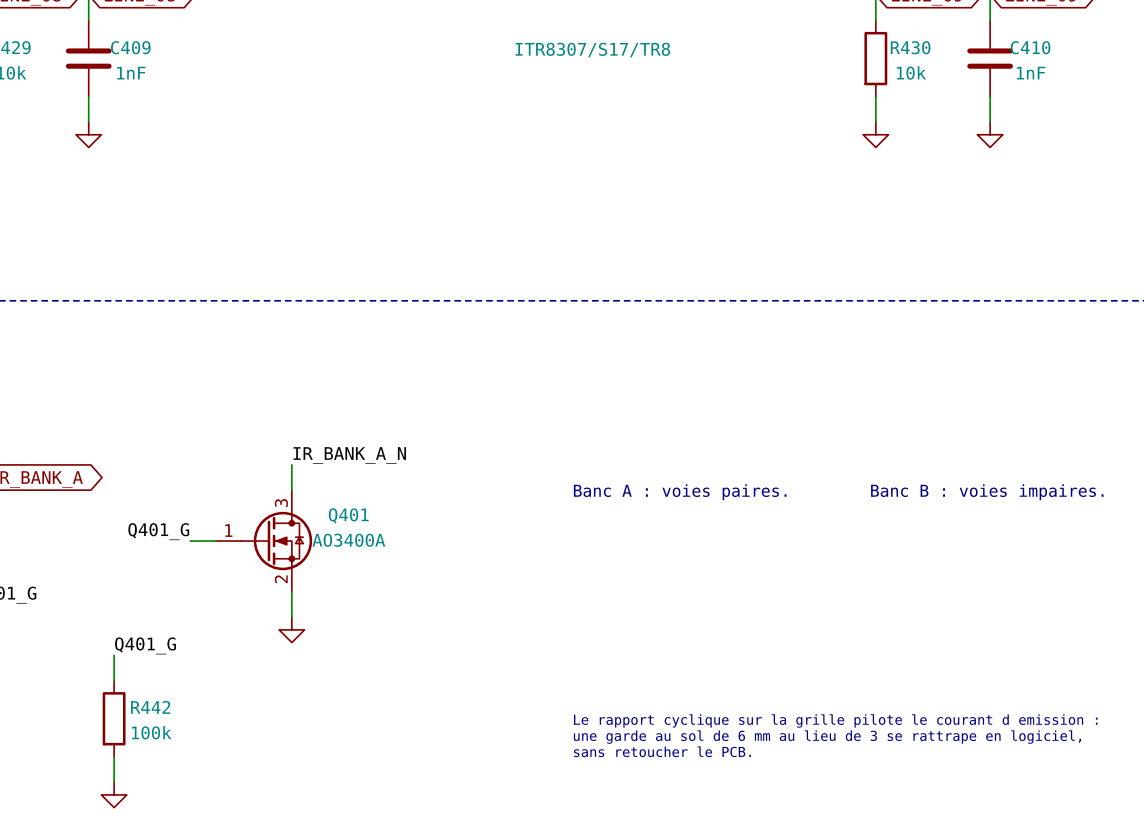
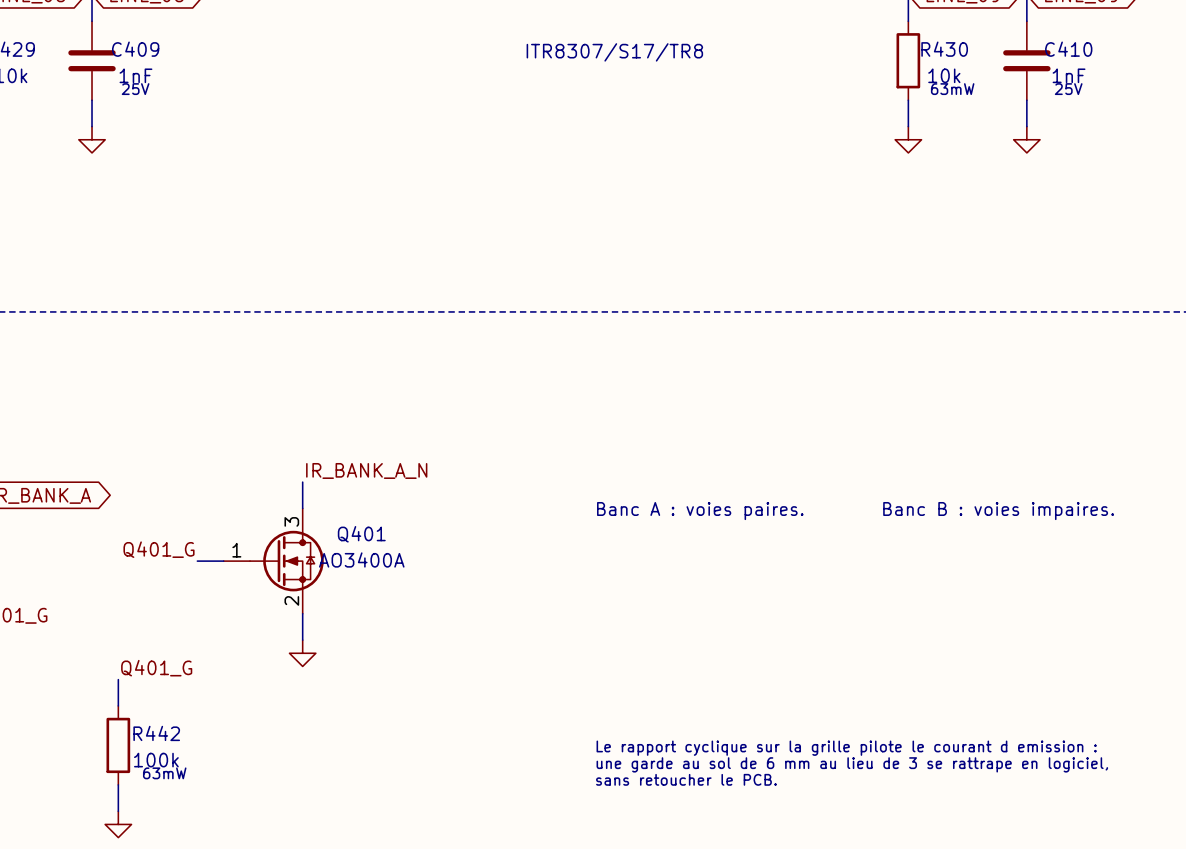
C409 text: none -> 25V (135, 89)
R430 text: none -> 63mW (952, 89)
C410 text: none -> 25V (1068, 89)
R442 text: none -> 63mW (164, 773)

